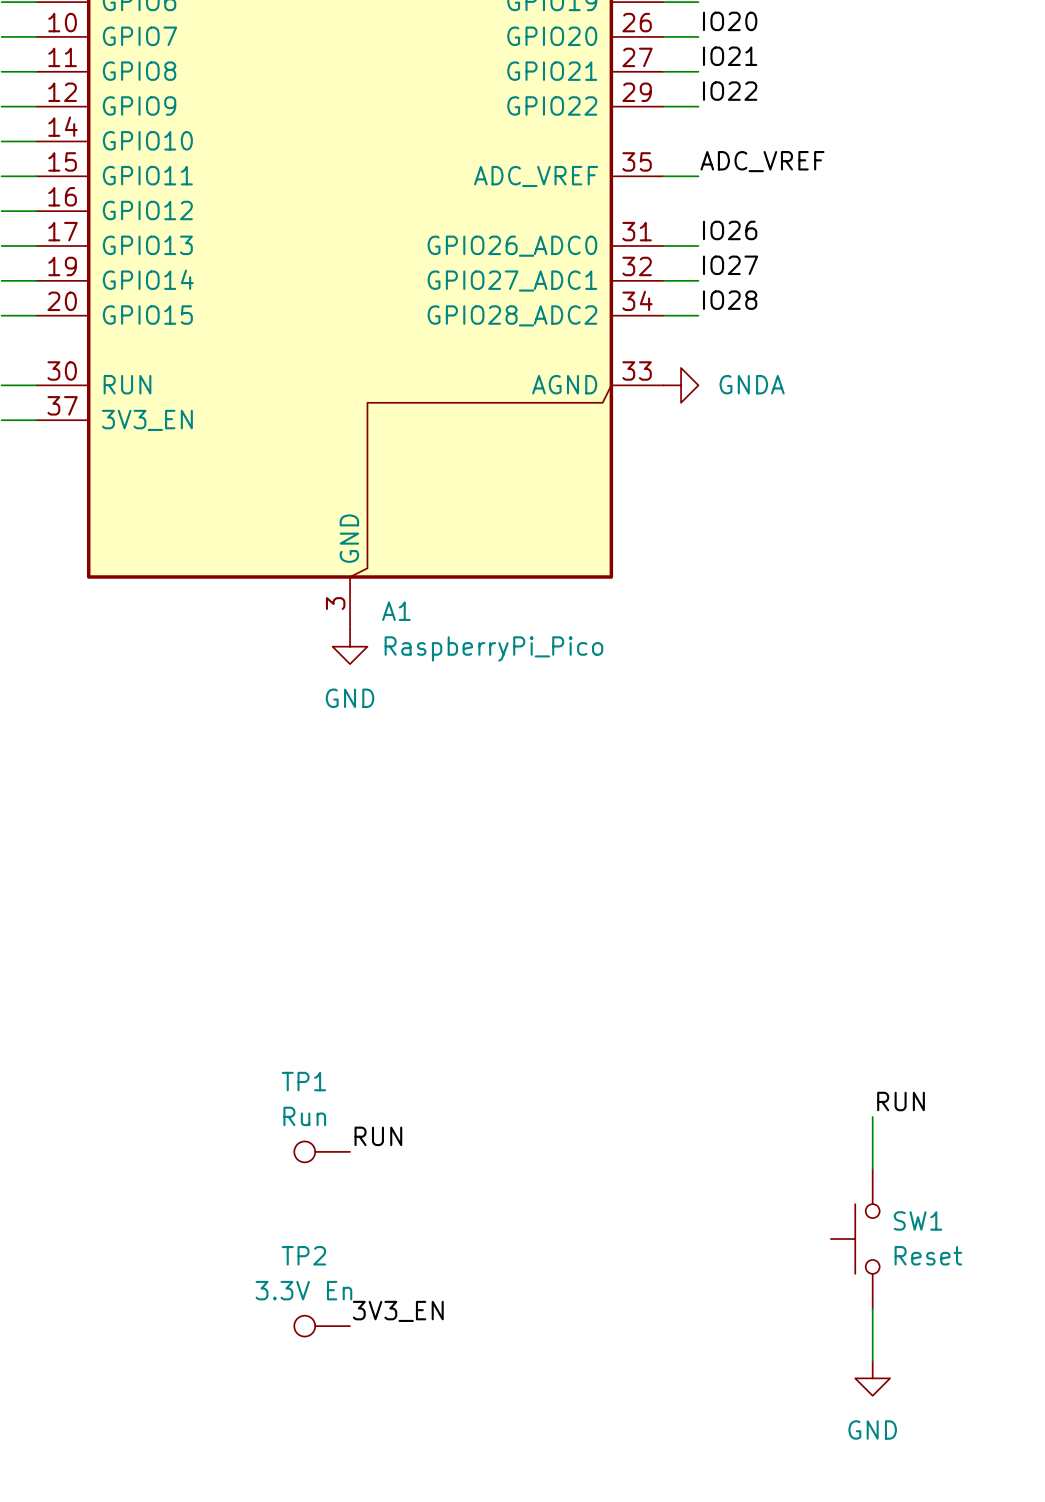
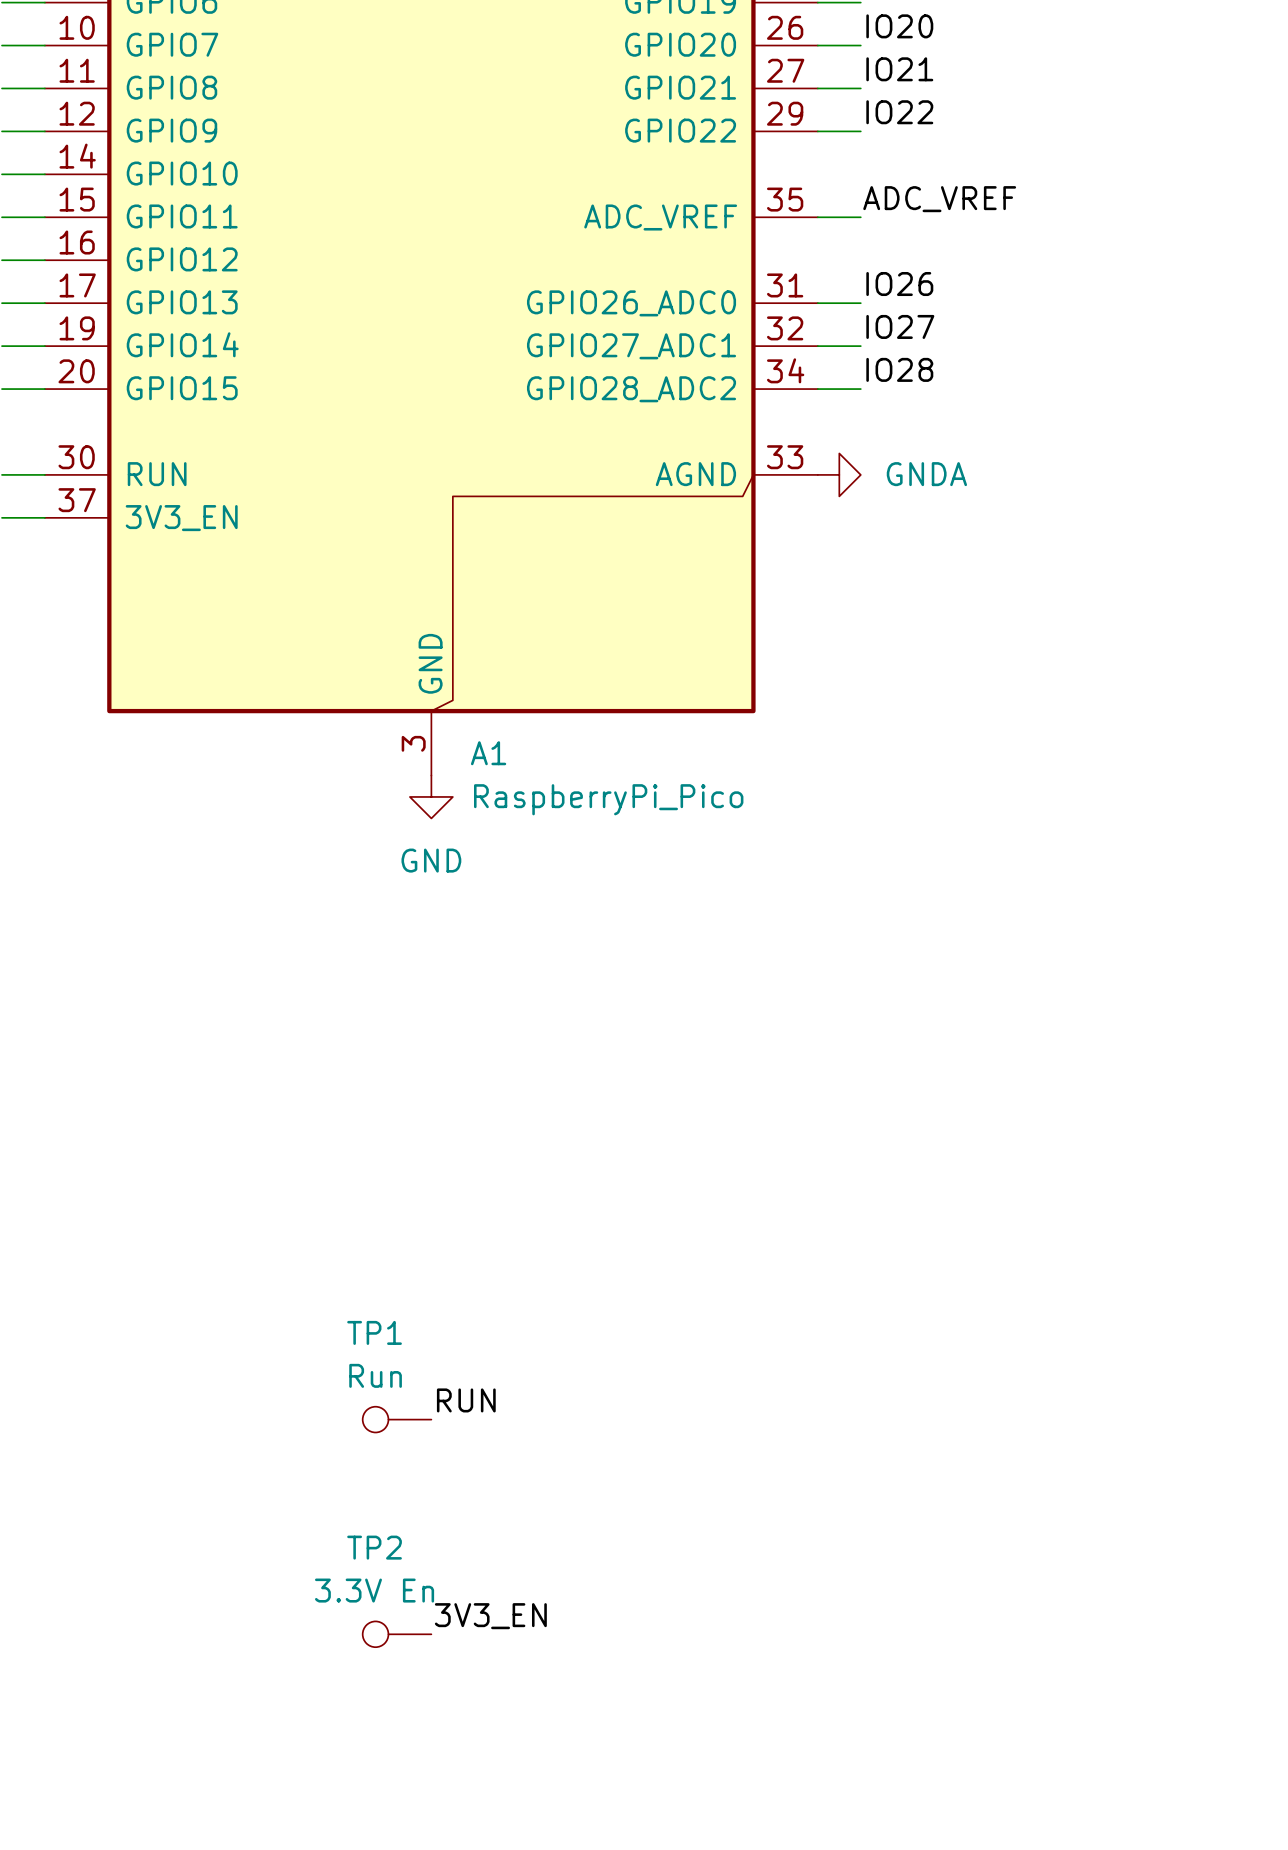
label: RUN (901, 1101) -> none
wire: (872, 1117) (872, 1169) -> none
SW1: Reset (855, 1239) -> none
wire: (872, 1308) (872, 1360) -> none
power symbol: GND (872, 1378) -> none

